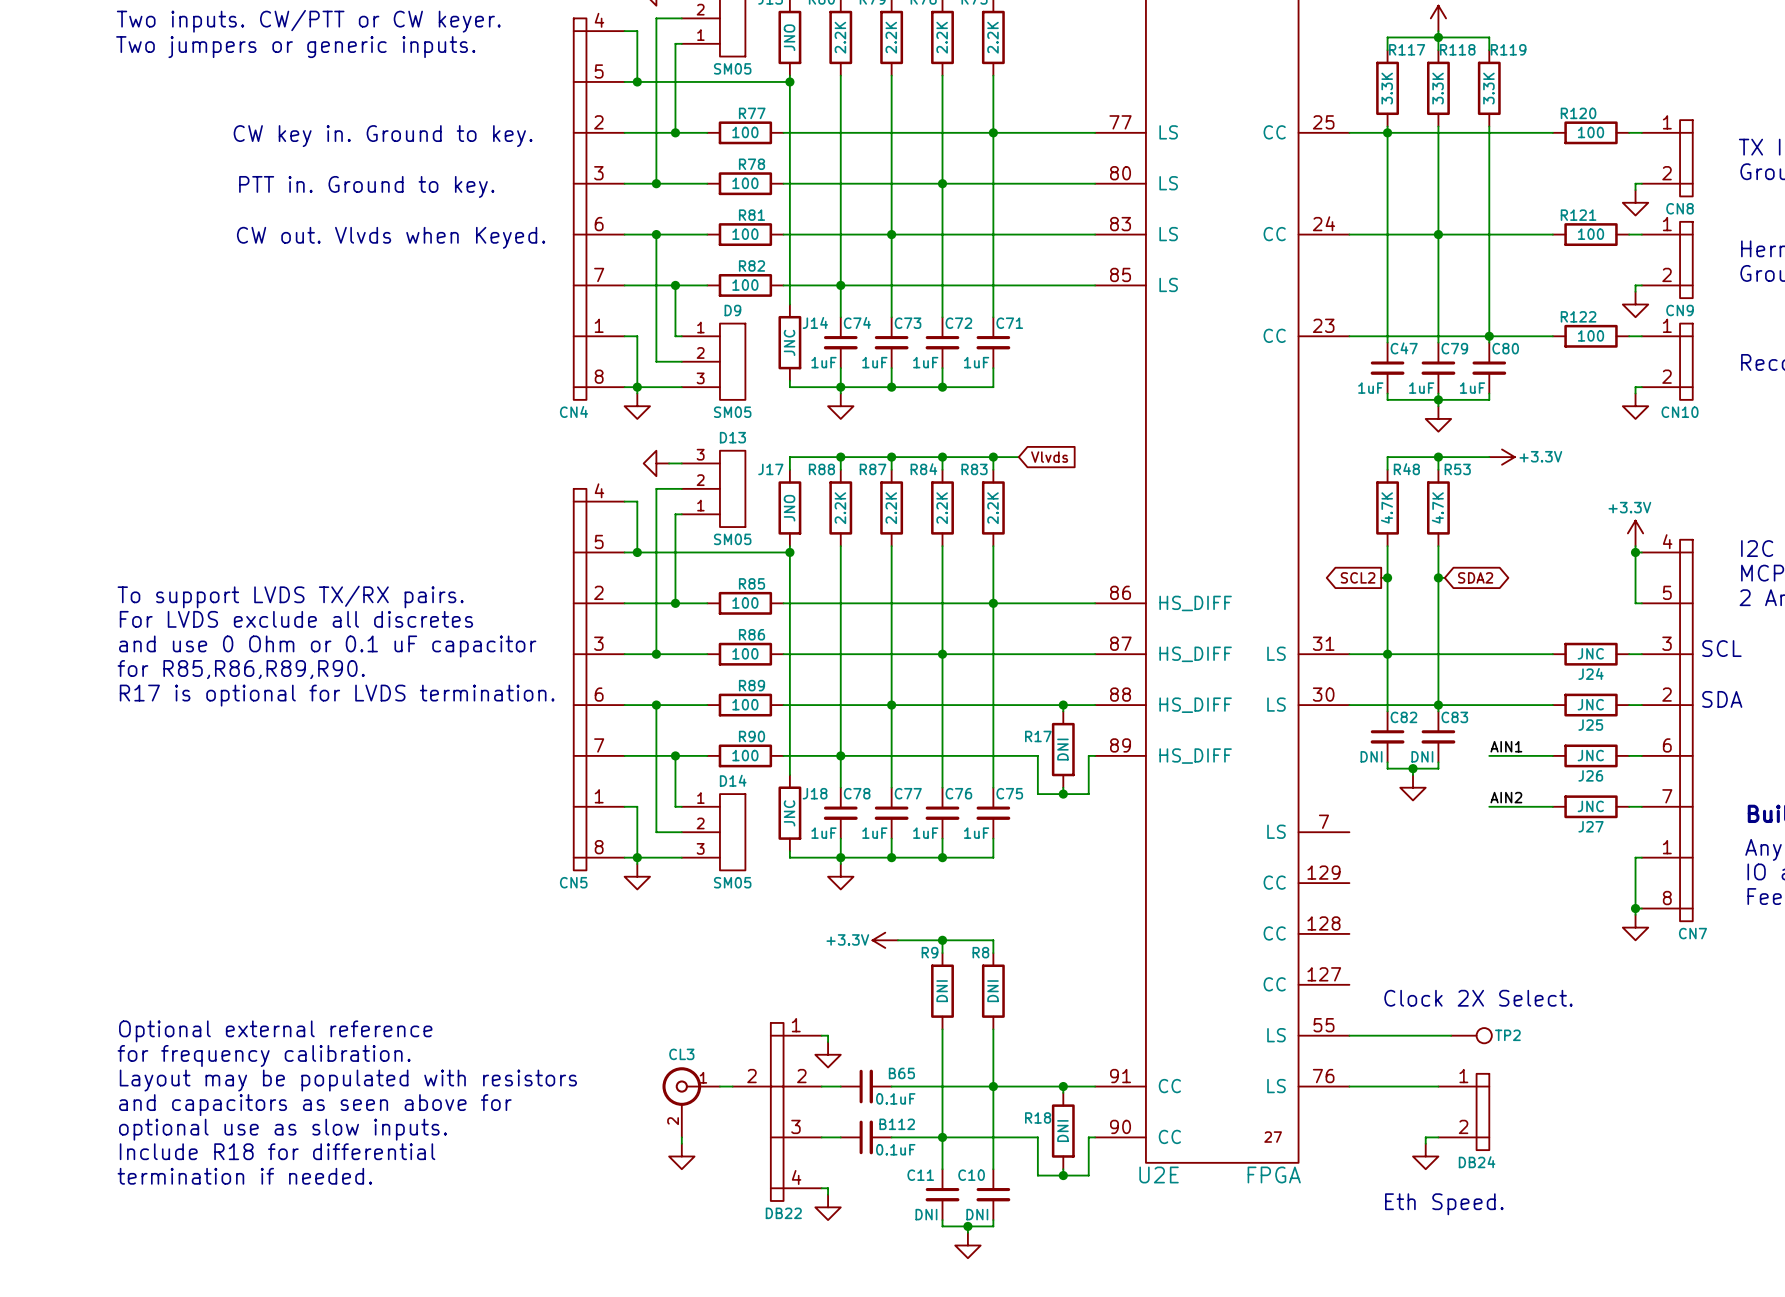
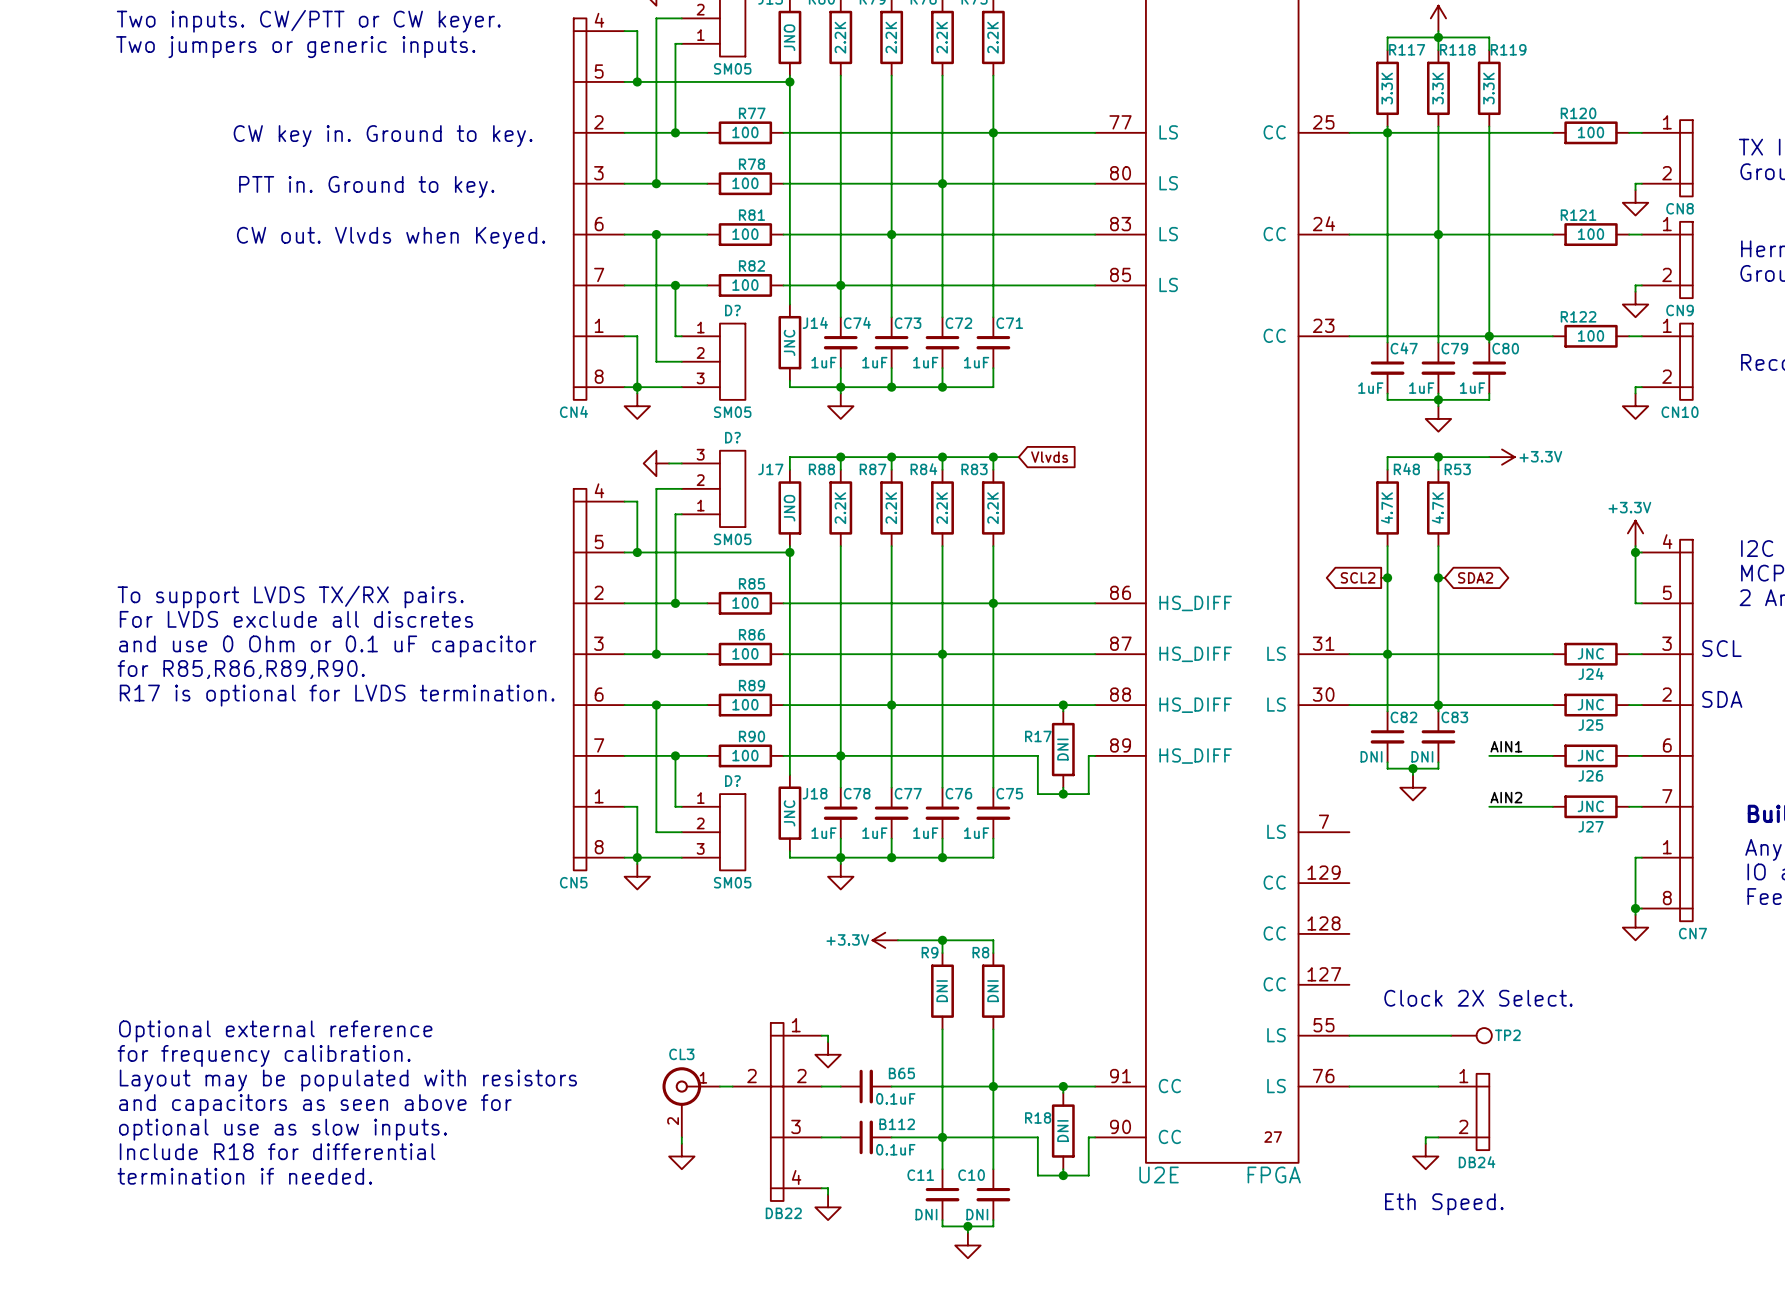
D9 name: D9 (732, 310) -> D? (732, 310)
D13 name: D13 (732, 437) -> D? (732, 437)
D14 name: D14 (733, 780) -> D? (732, 780)

